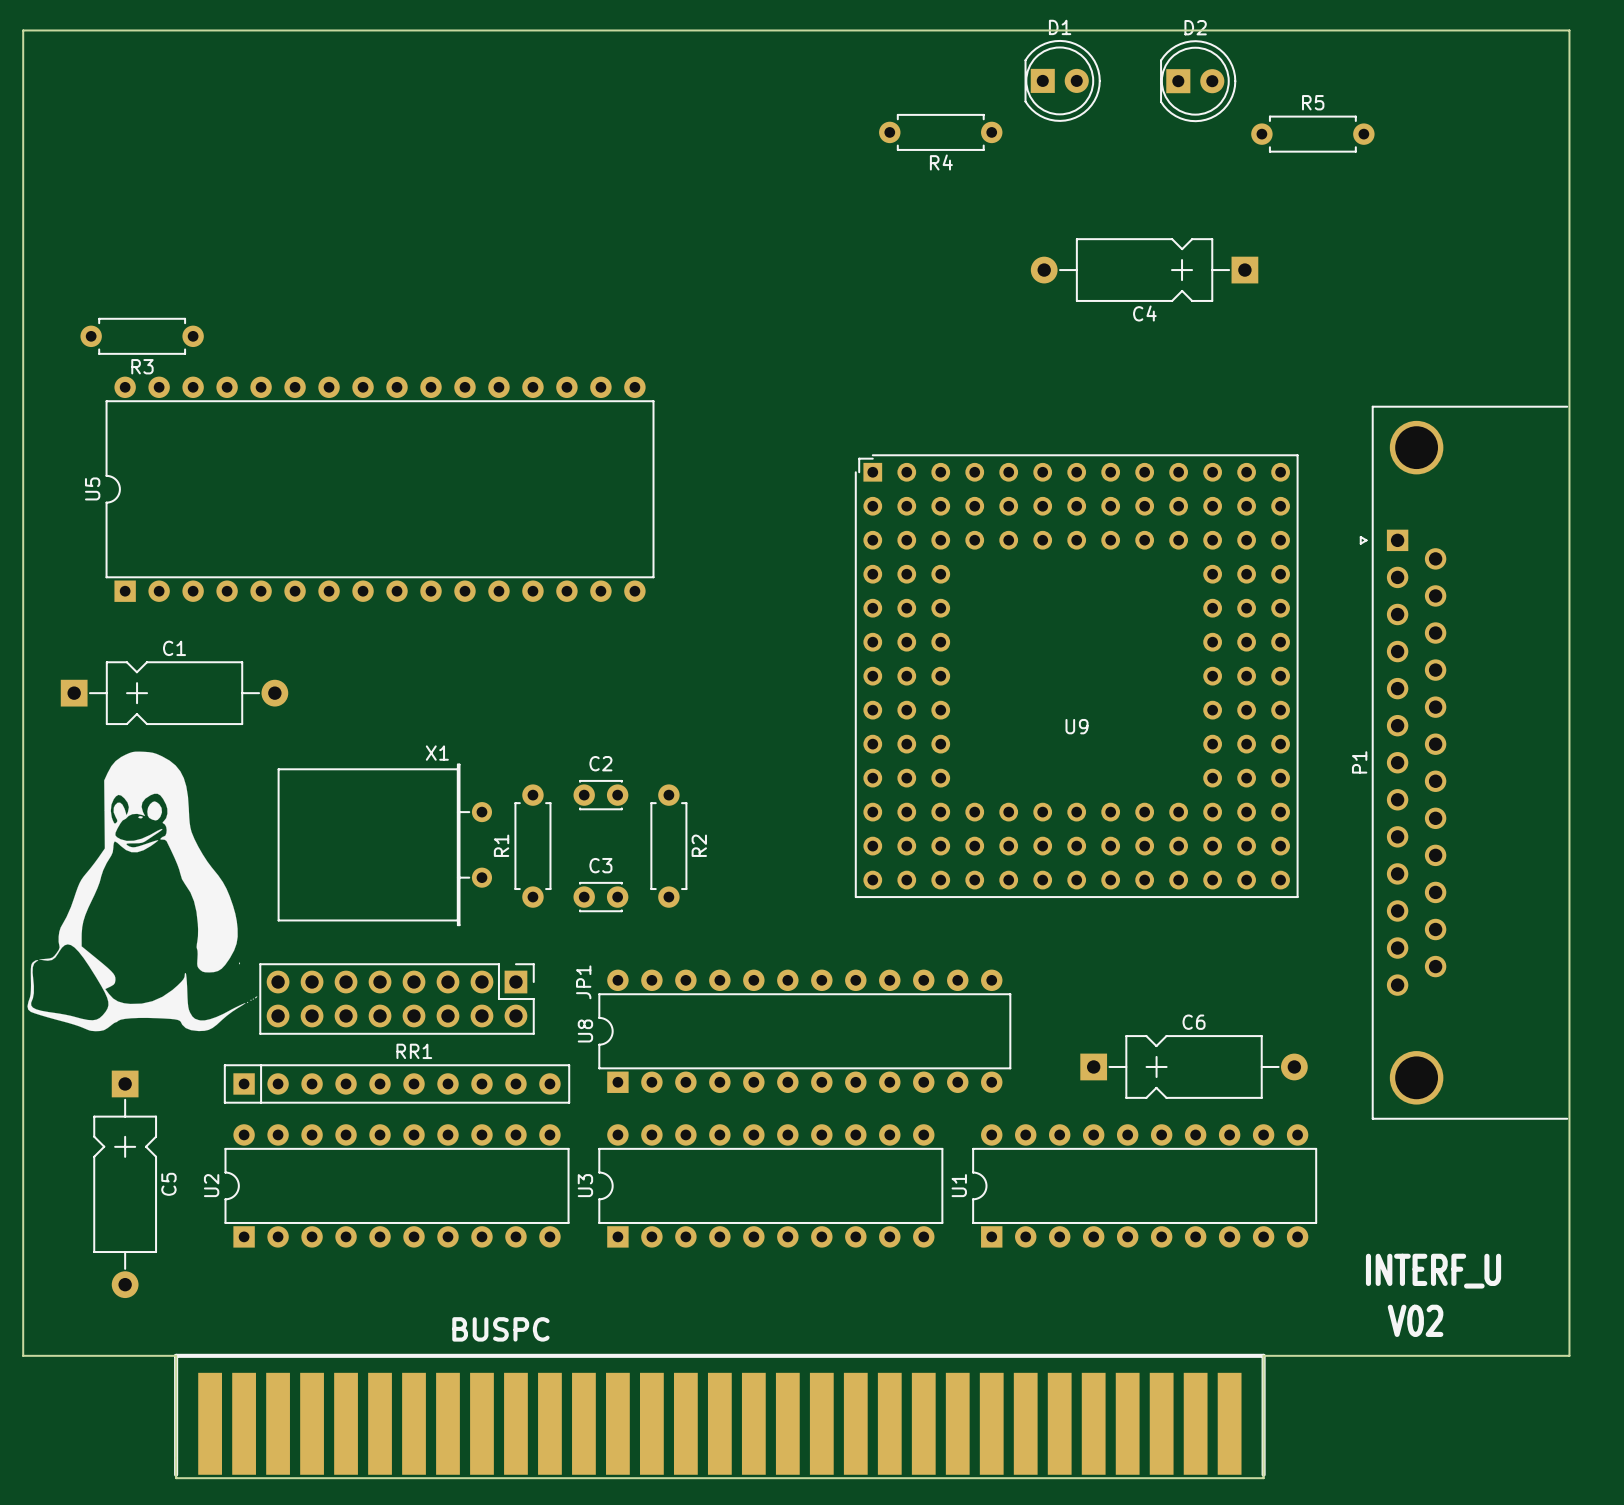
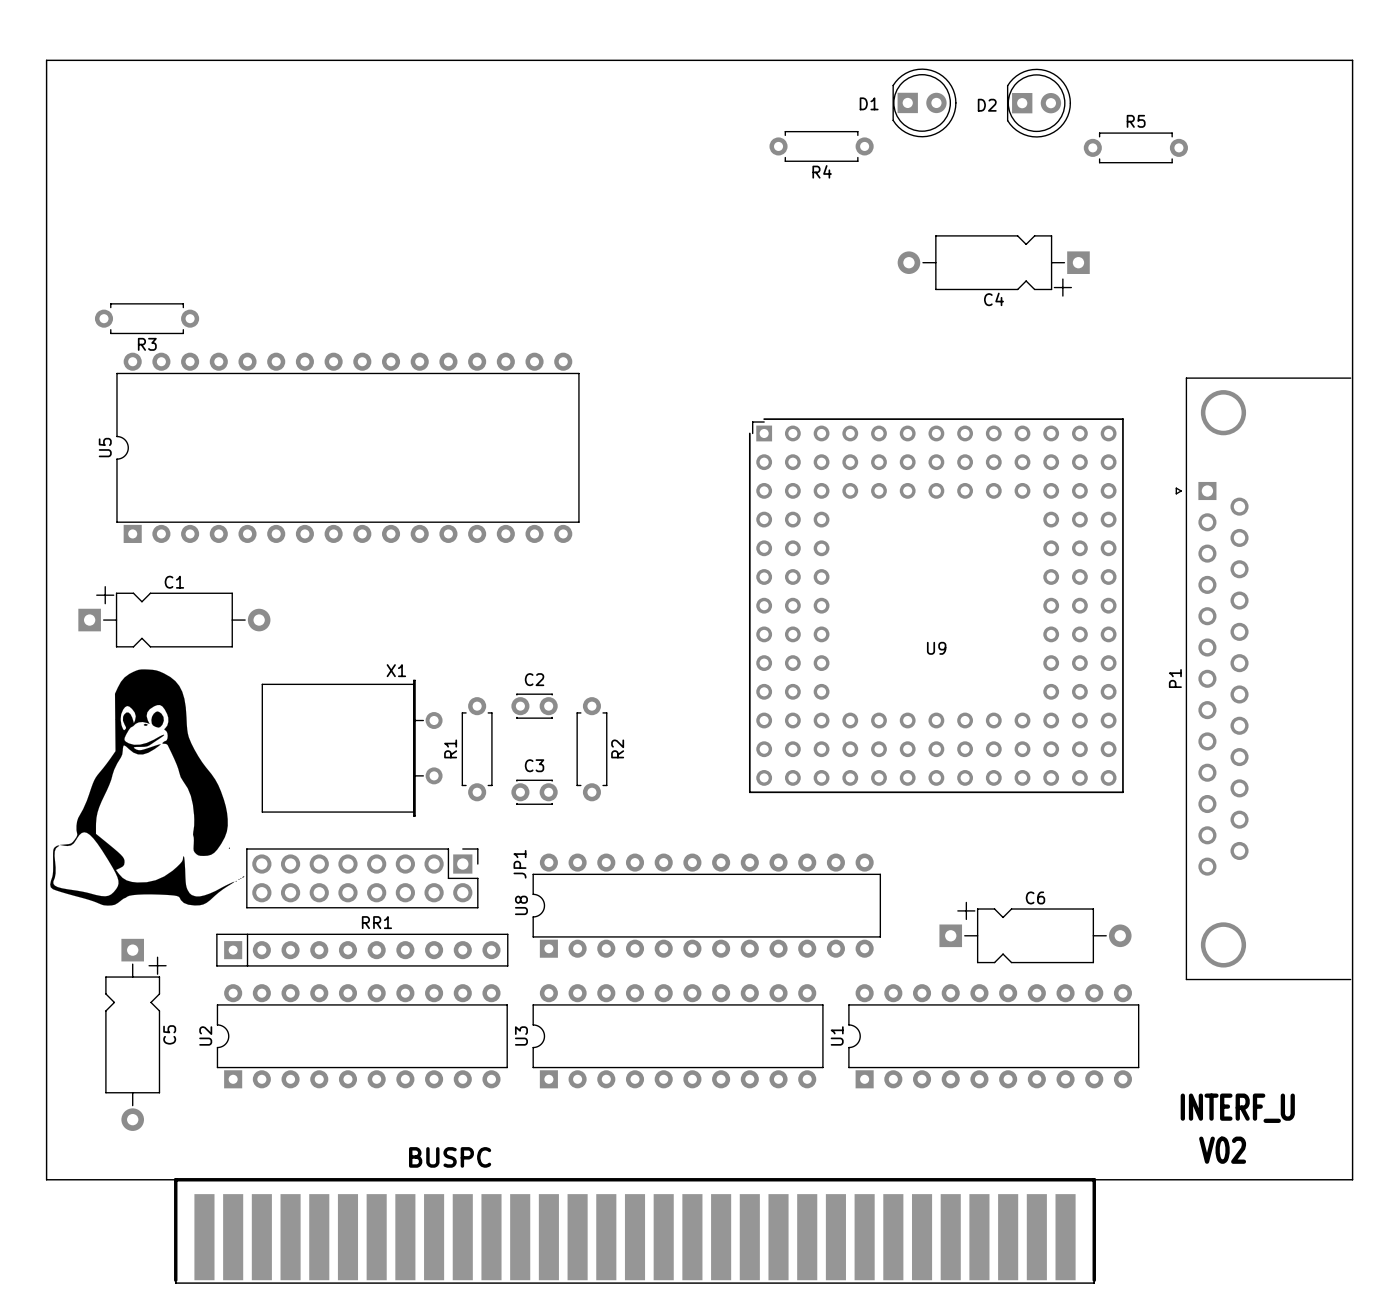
D1 name position: D1 (1060, 27) -> D1 (869, 103)
D2 name position: D2 (1195, 27) -> D2 (987, 105)
C4 footprint: [1030, 238, 1259, 302] -> [897, 235, 1090, 297]
C1 footprint: [60, 661, 289, 725] -> [78, 586, 271, 648]
C6 footprint: [1080, 1035, 1308, 1099] -> [939, 901, 1132, 964]
C5 footprint: [93, 1070, 157, 1299] -> [105, 938, 167, 1131]

